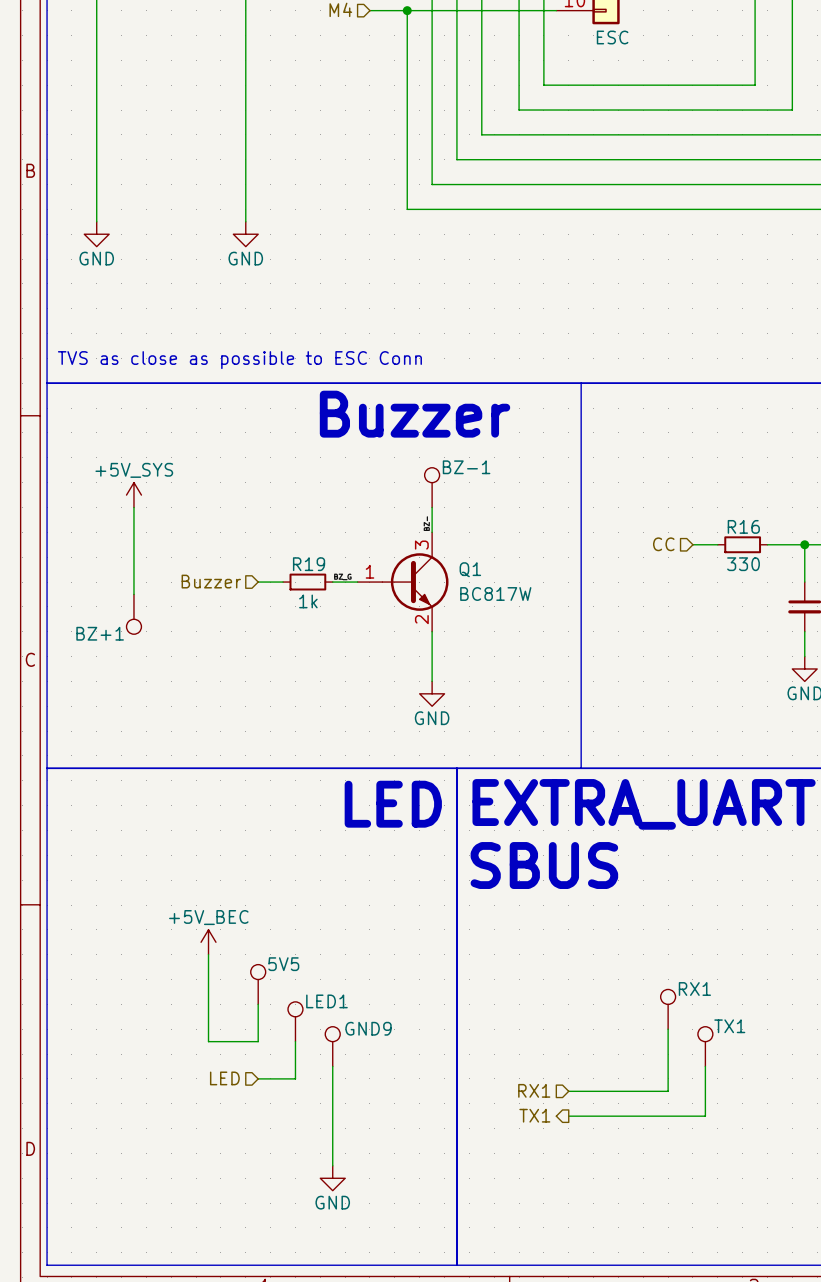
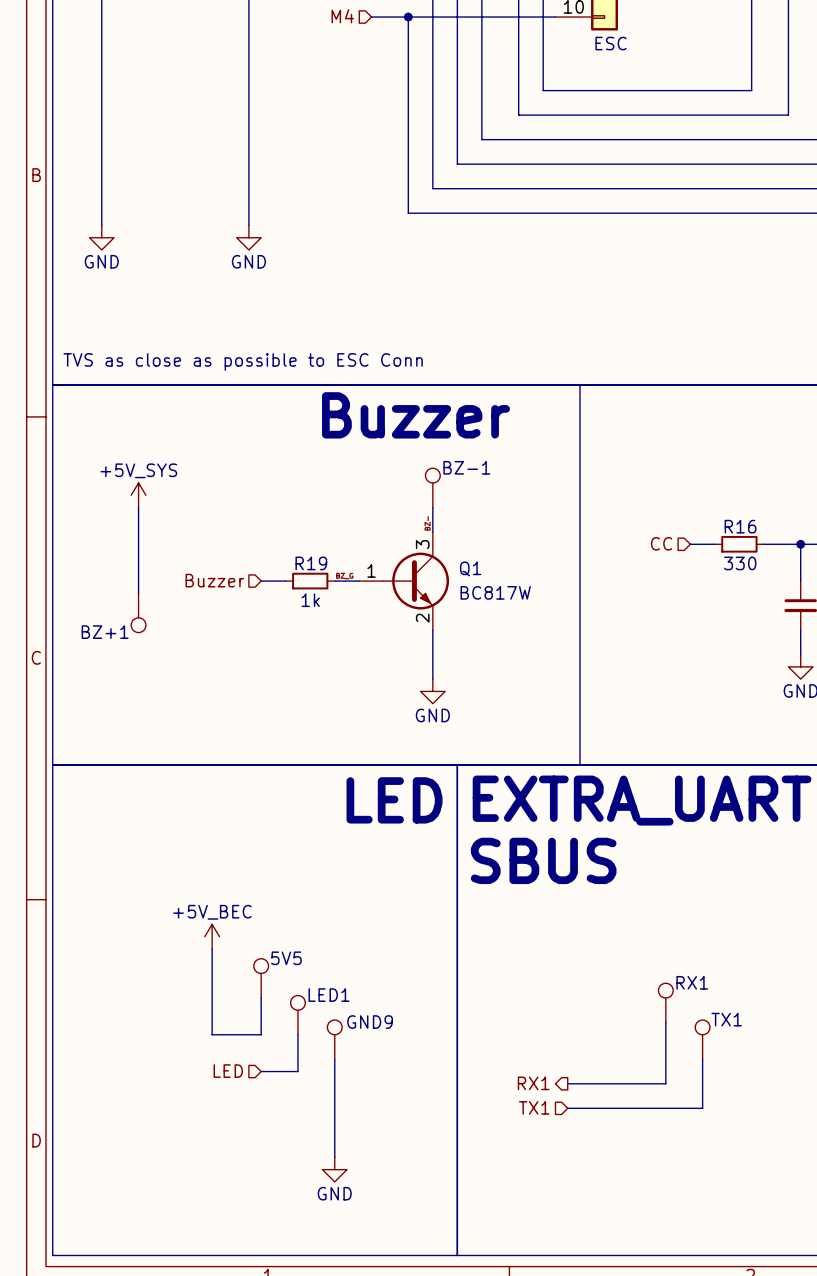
hierarchical label shape: input (534, 1090) -> output (533, 1083)
hierarchical label shape: output (534, 1115) -> input (534, 1107)

